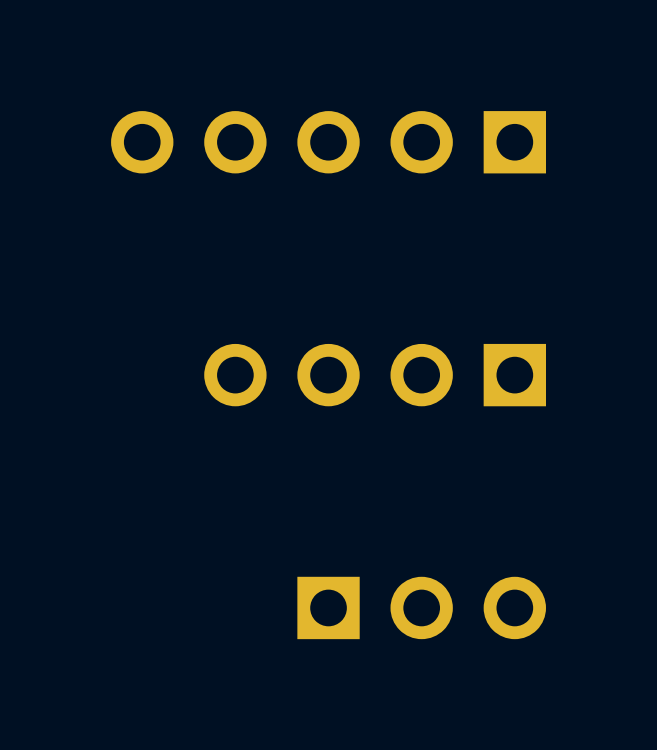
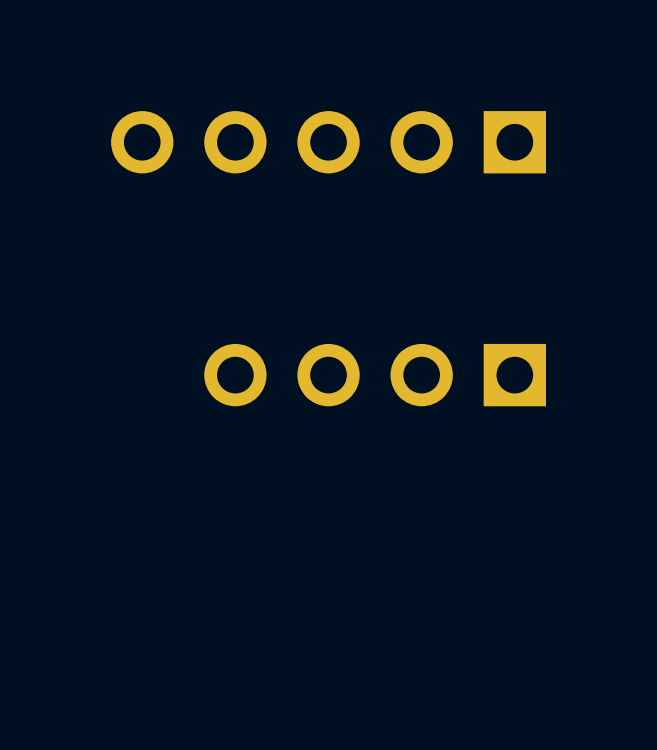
part: (421, 607) -> none

